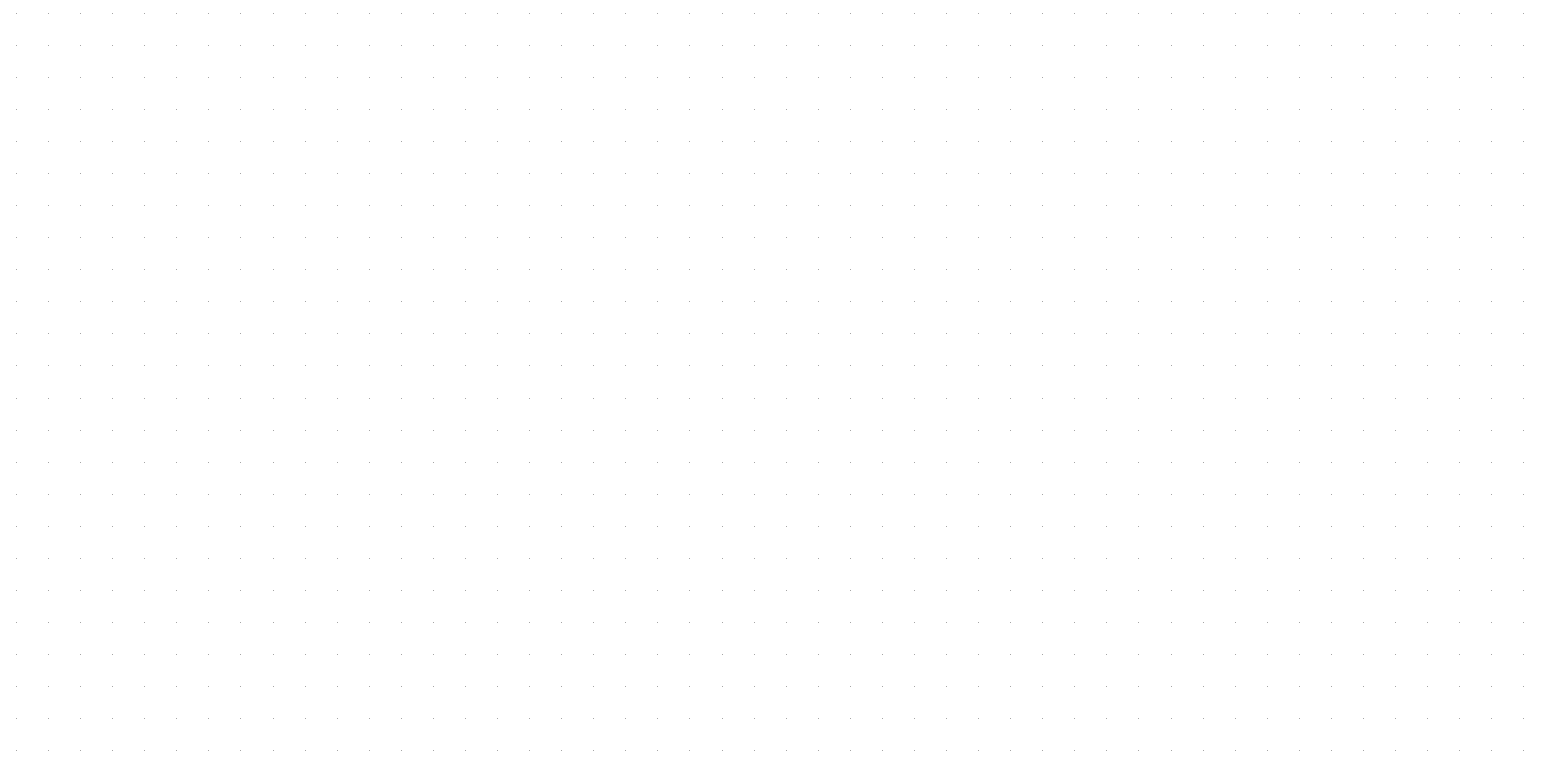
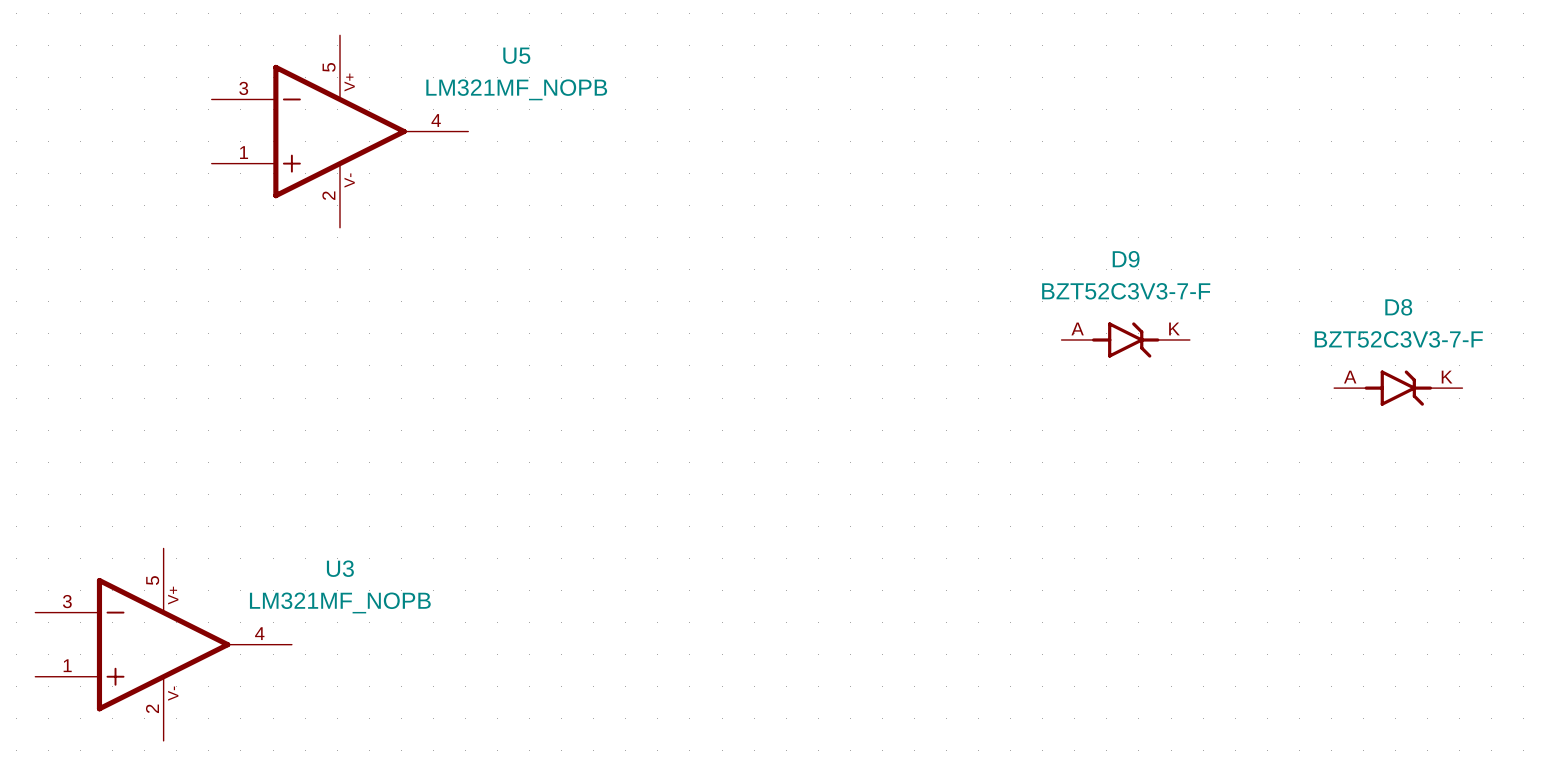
U5: none -> LM321MF_NOPB (340, 131)
D9: none -> BZT52C3V3-7-F (1125, 340)
D8: none -> BZT52C3V3-7-F (1398, 388)
U3: none -> LM321MF_NOPB (163, 644)

